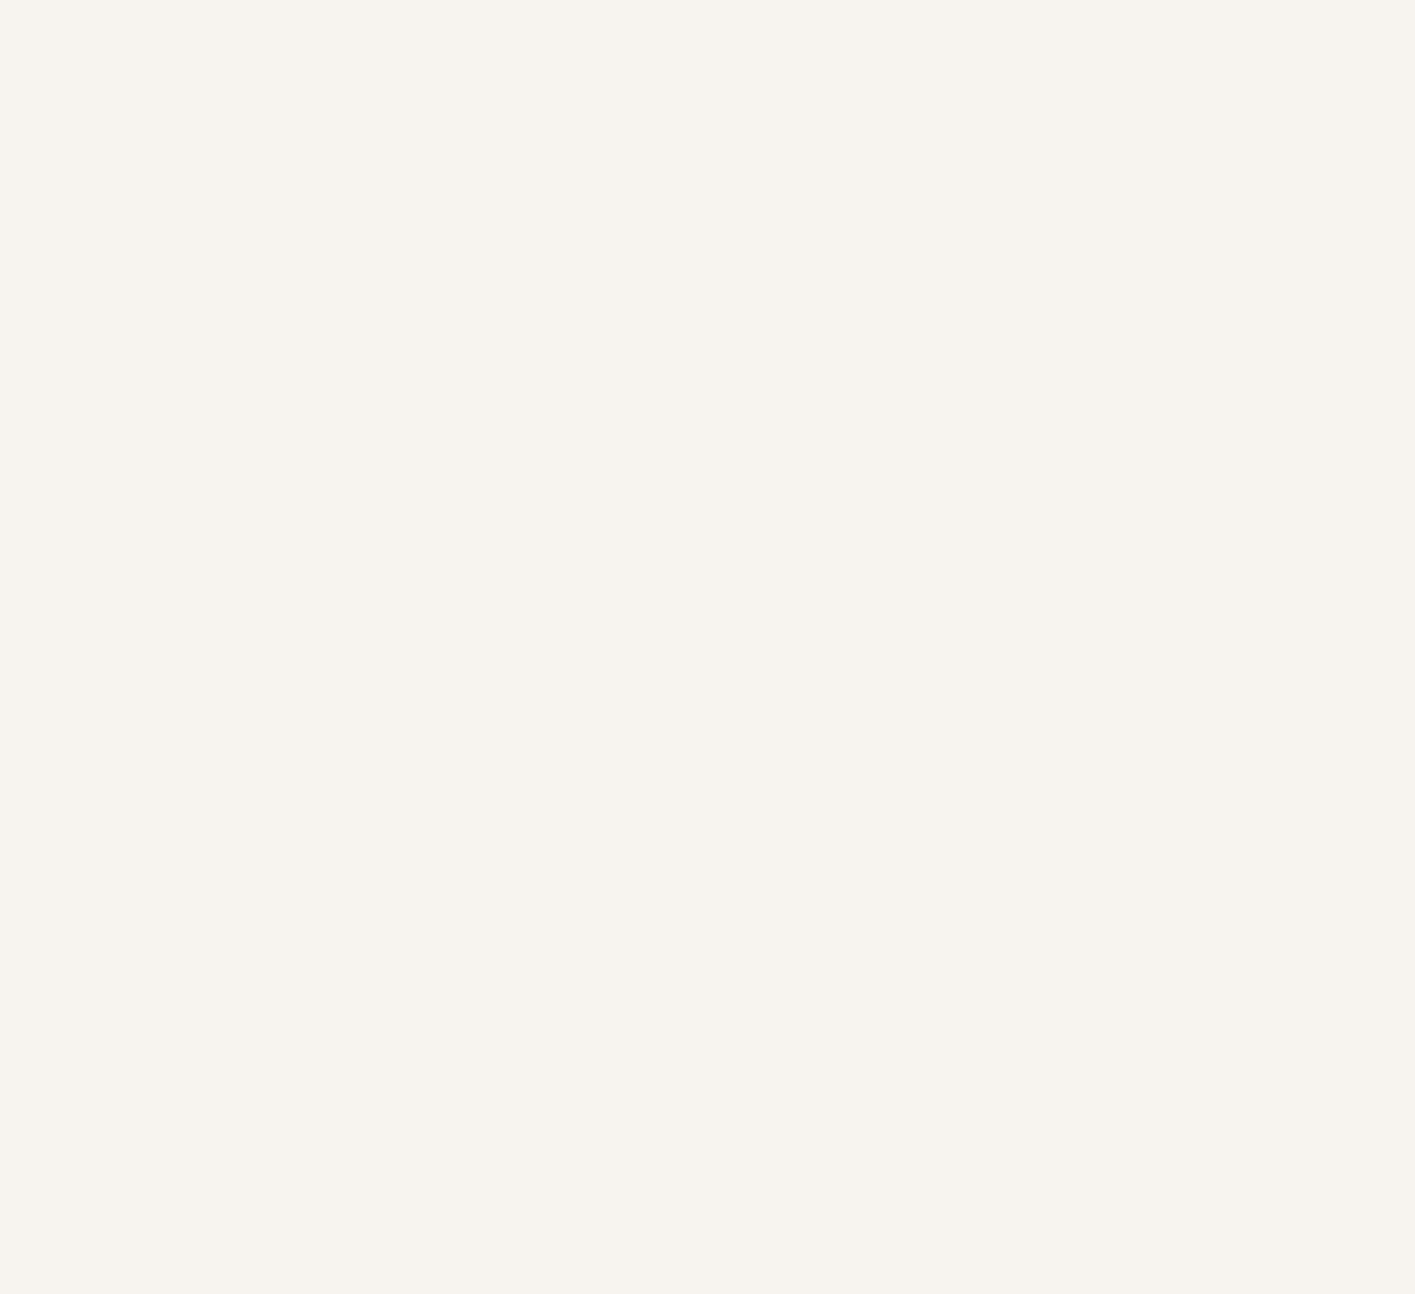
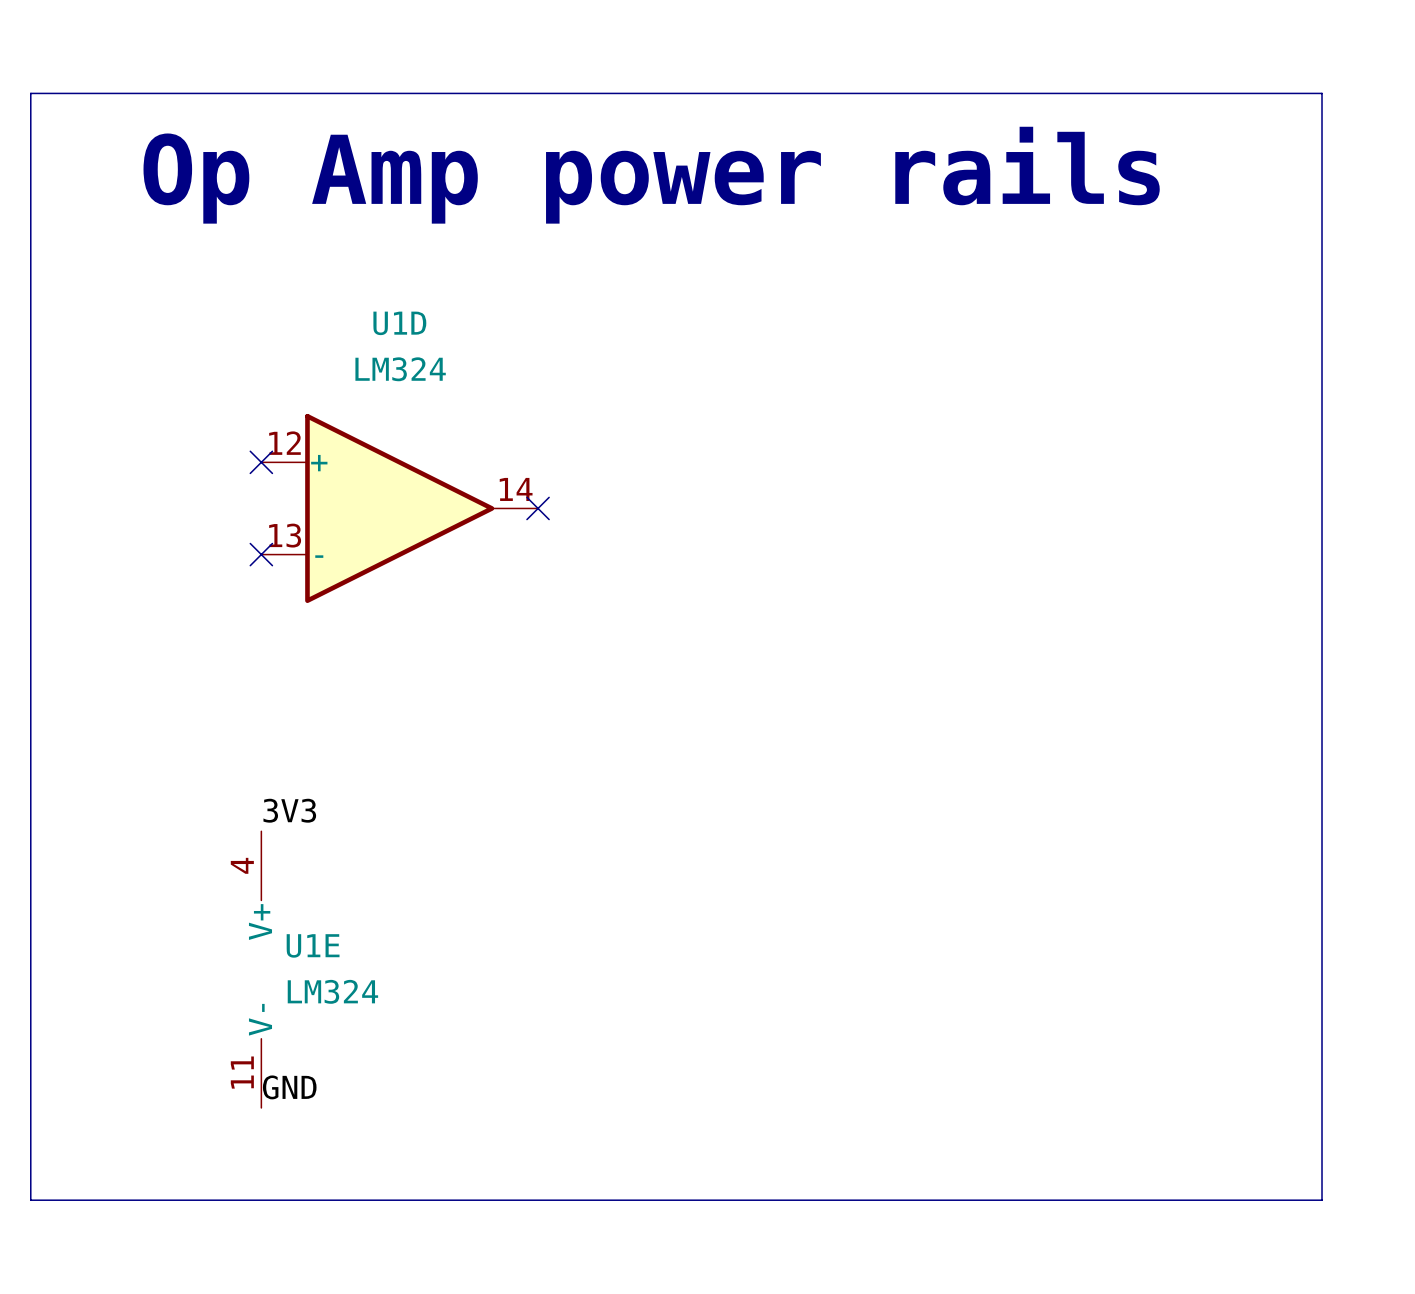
line: none -> (30, 93) (1322, 93) (1322, 1200) (30, 1200) (30, 93)
text: none -> Op Amp power rails (651, 175)
no-connect mark: none -> (261, 462)
U1D: none -> LM324 (399, 508)
no-connect mark: none -> (538, 508)
no-connect mark: none -> (261, 554)
label: none -> 3V3 (289, 810)
U1E: none -> LM324 (261, 969)
label: none -> GND (289, 1087)

